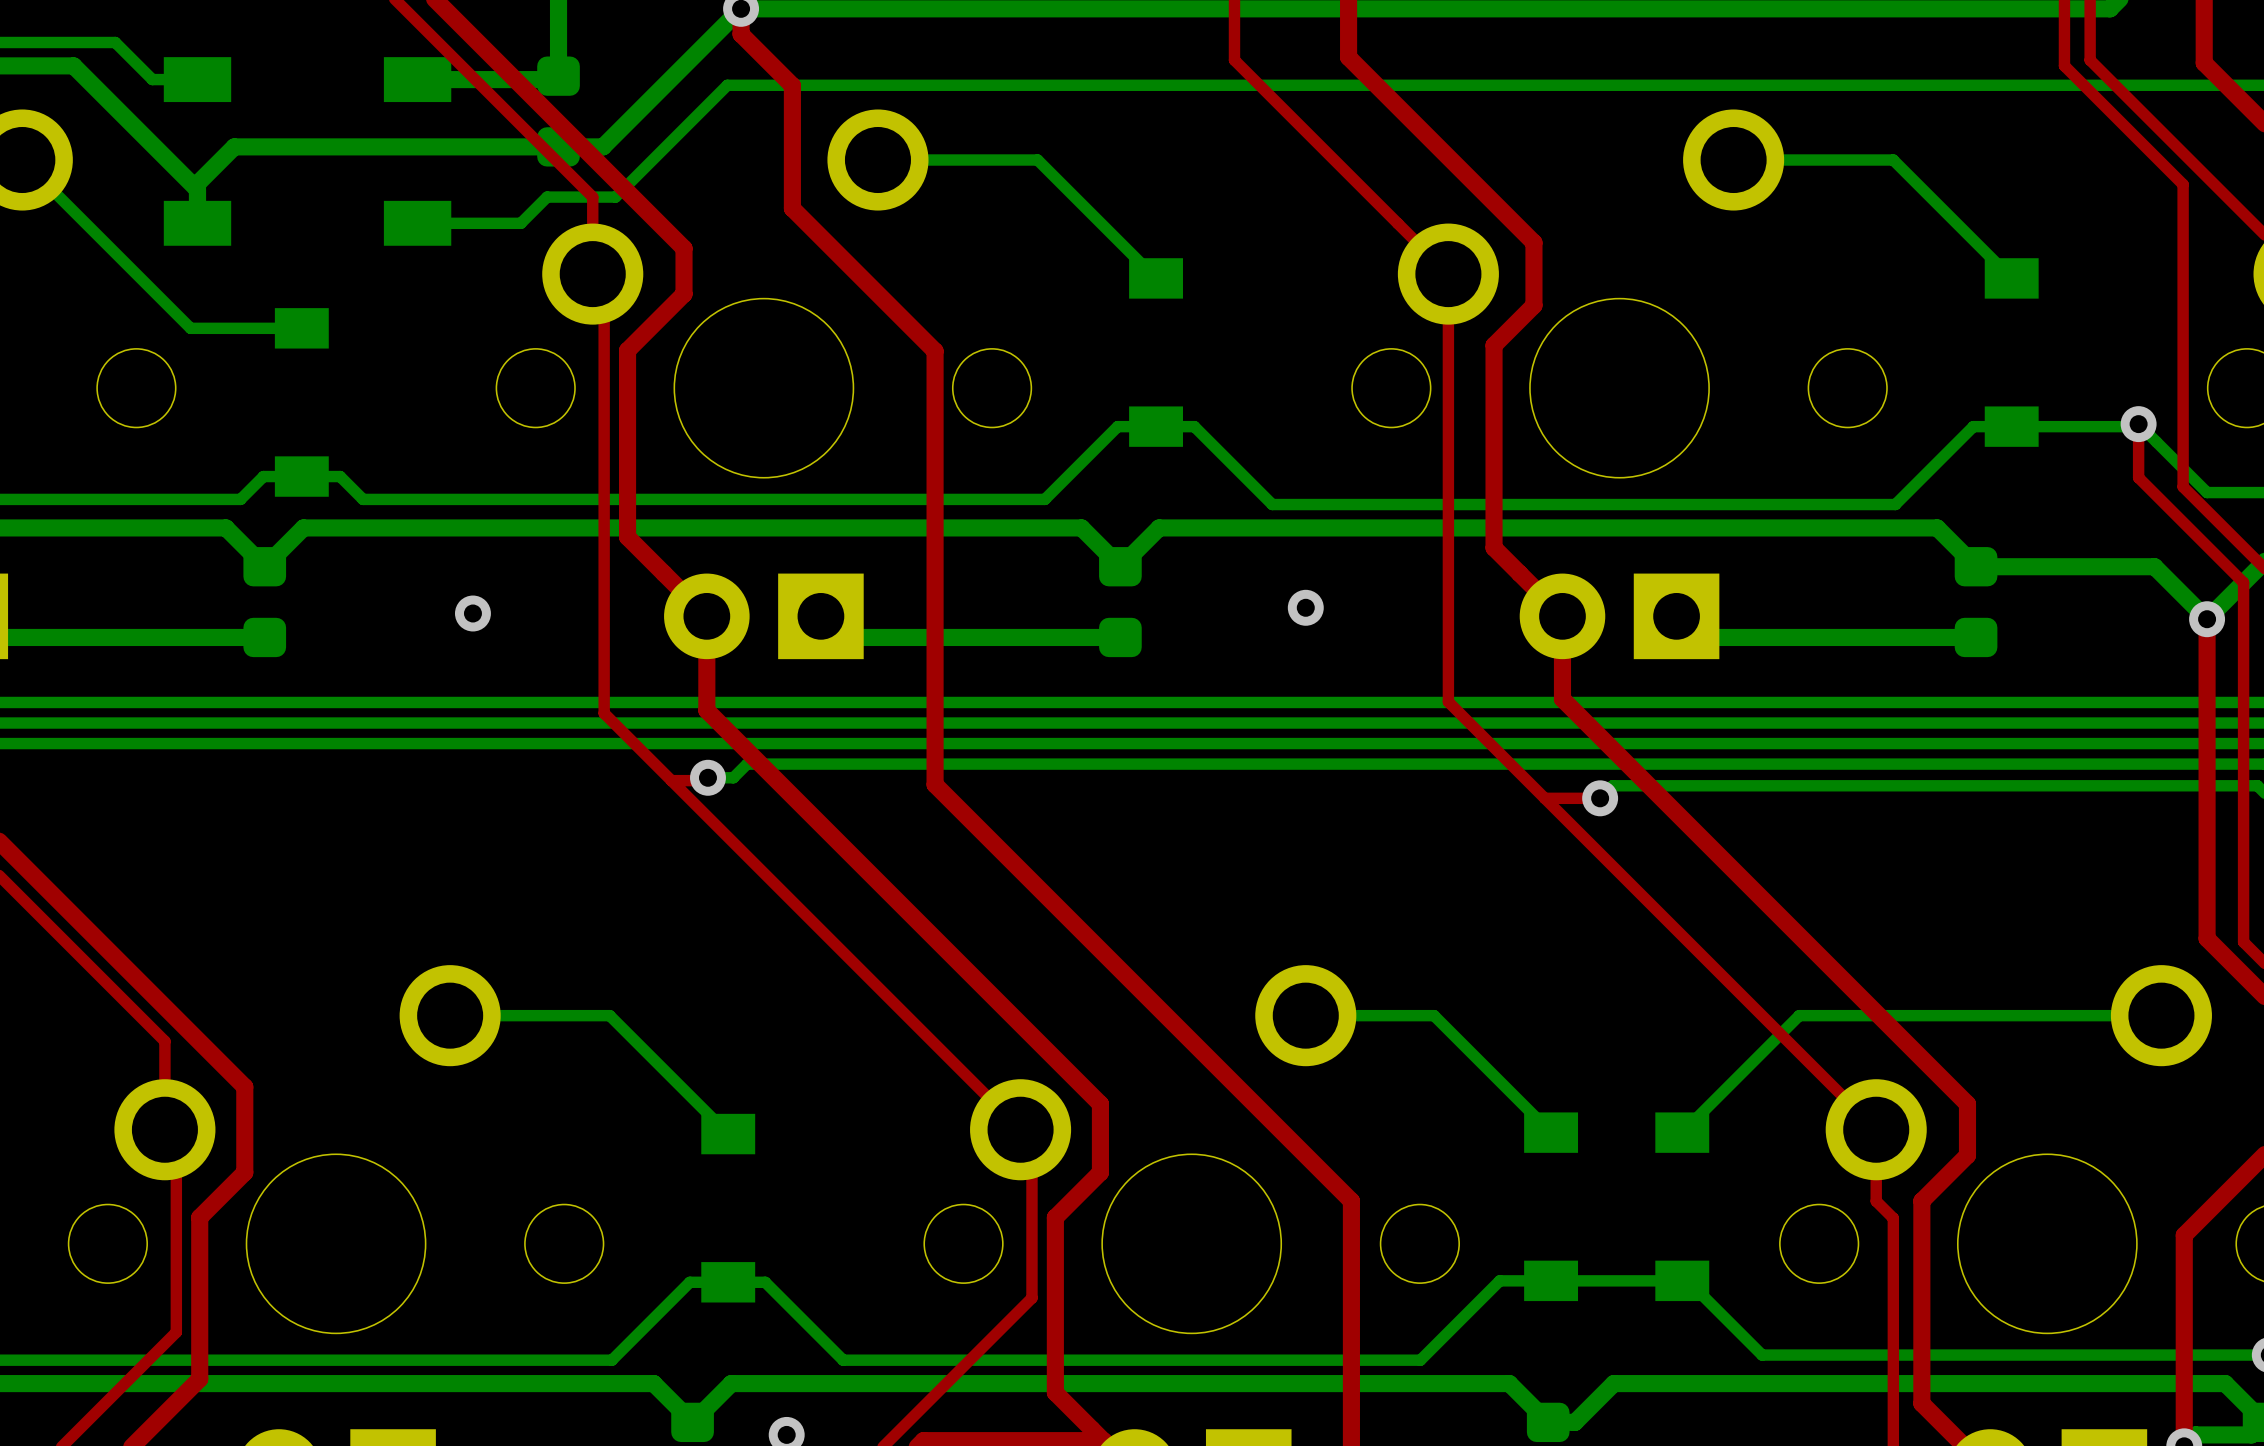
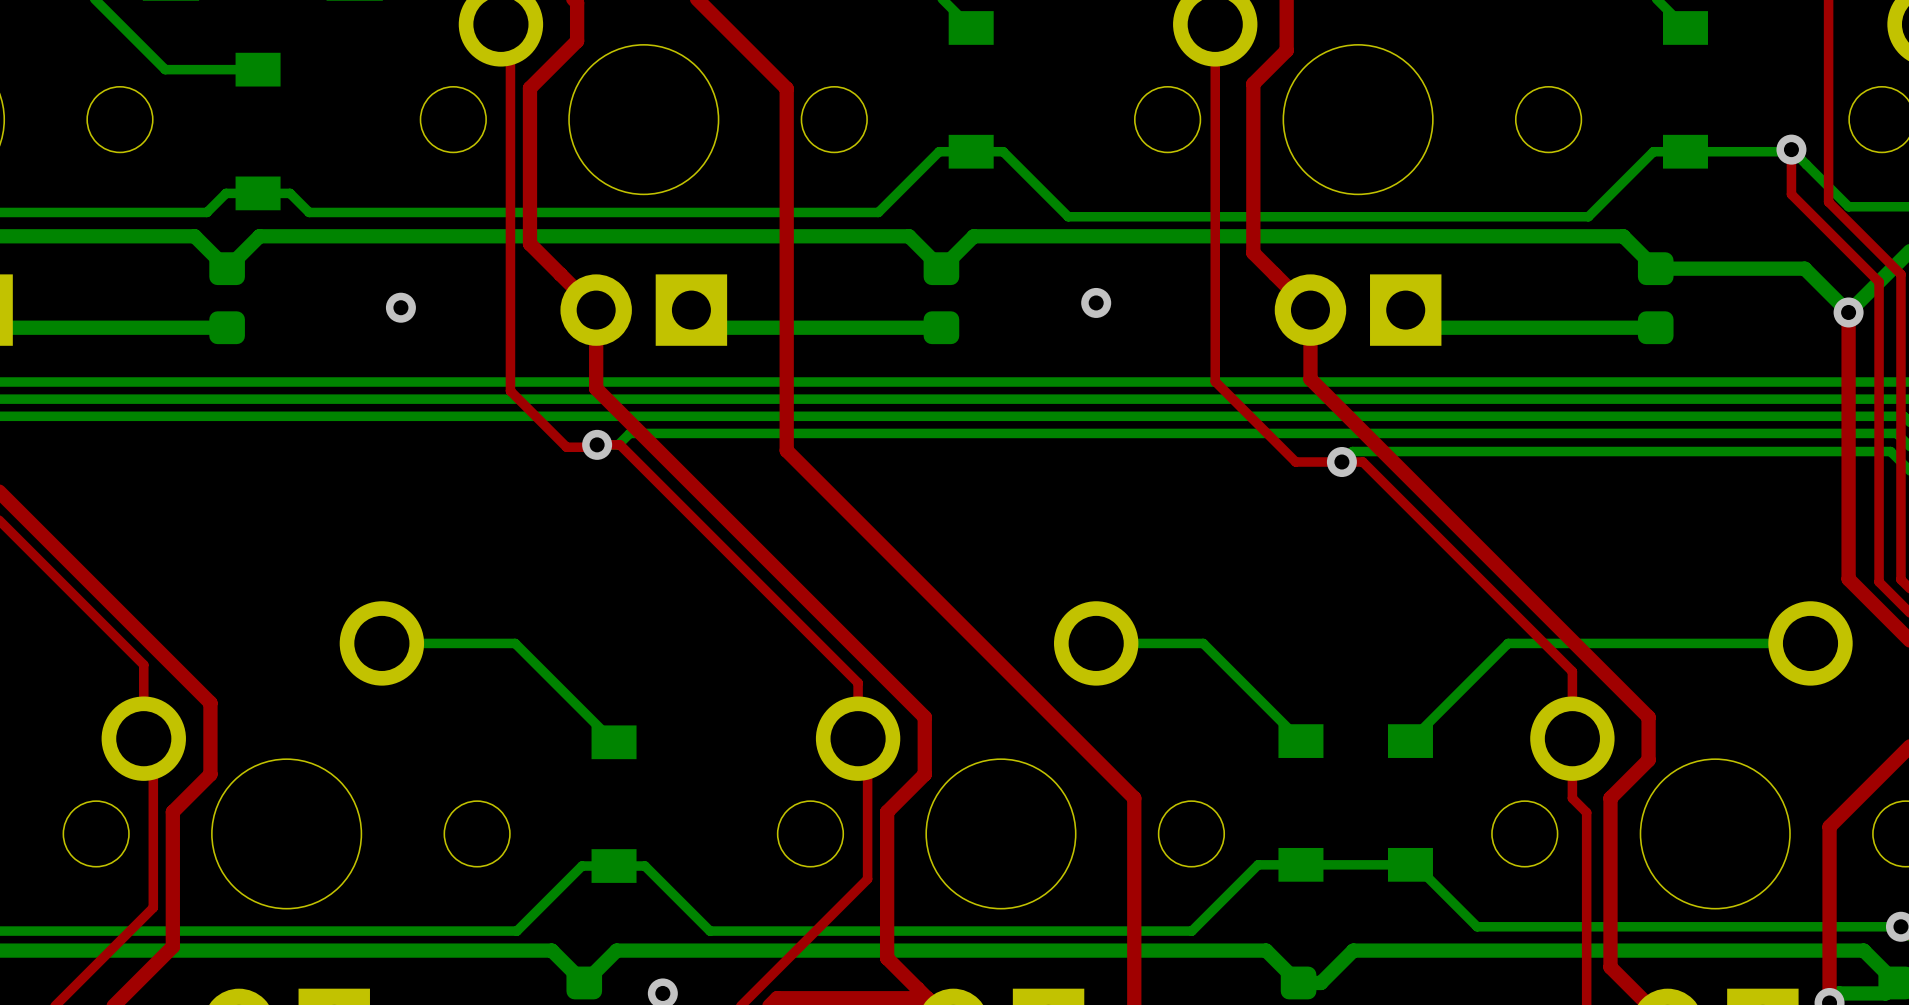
top track: (671, 780) (1020, 1129) -> (597, 444) (619, 444) (858, 682) (858, 738)
top track: (1544, 798) (1876, 1129) -> (1341, 462) (1362, 462) (1572, 671) (1572, 738)

